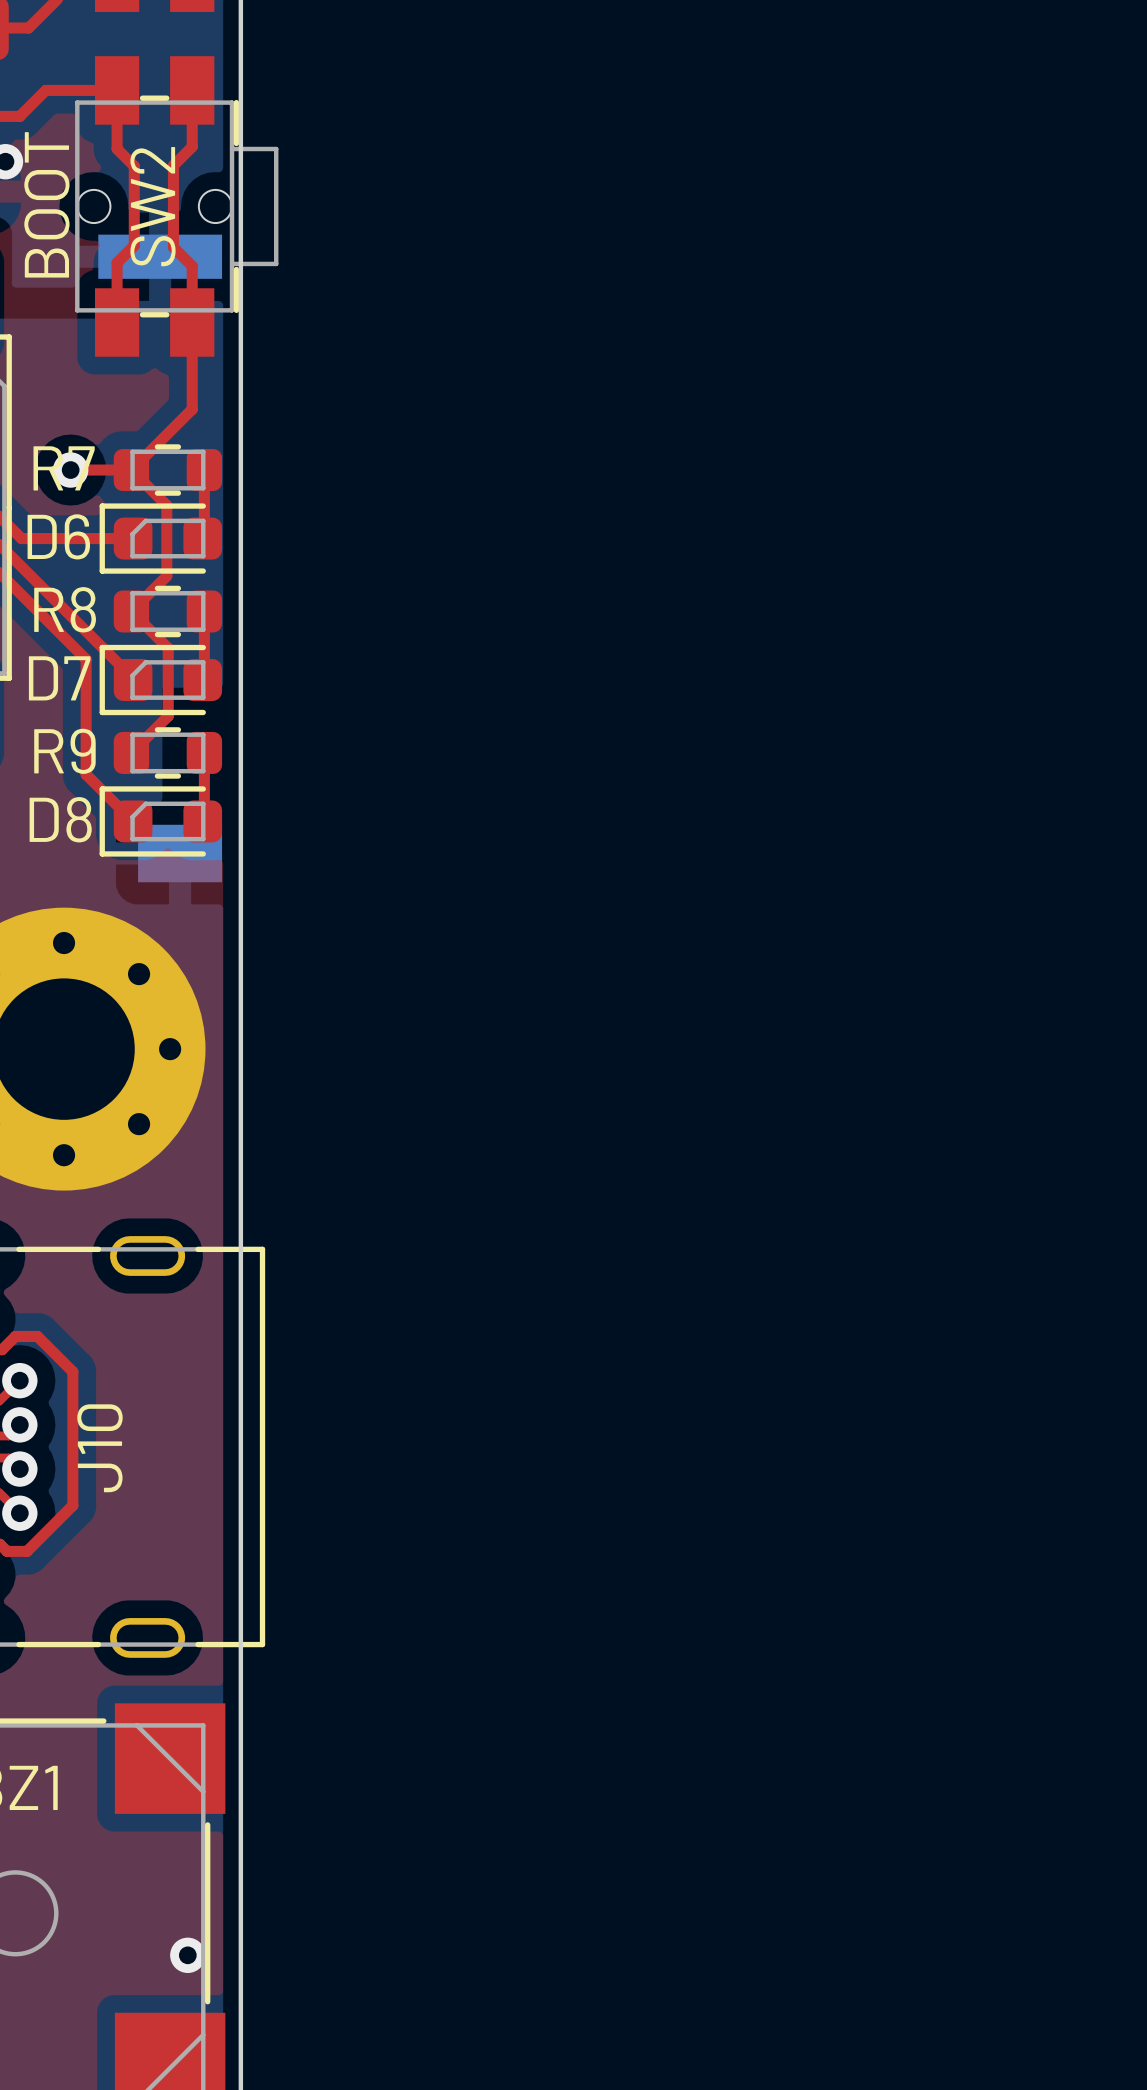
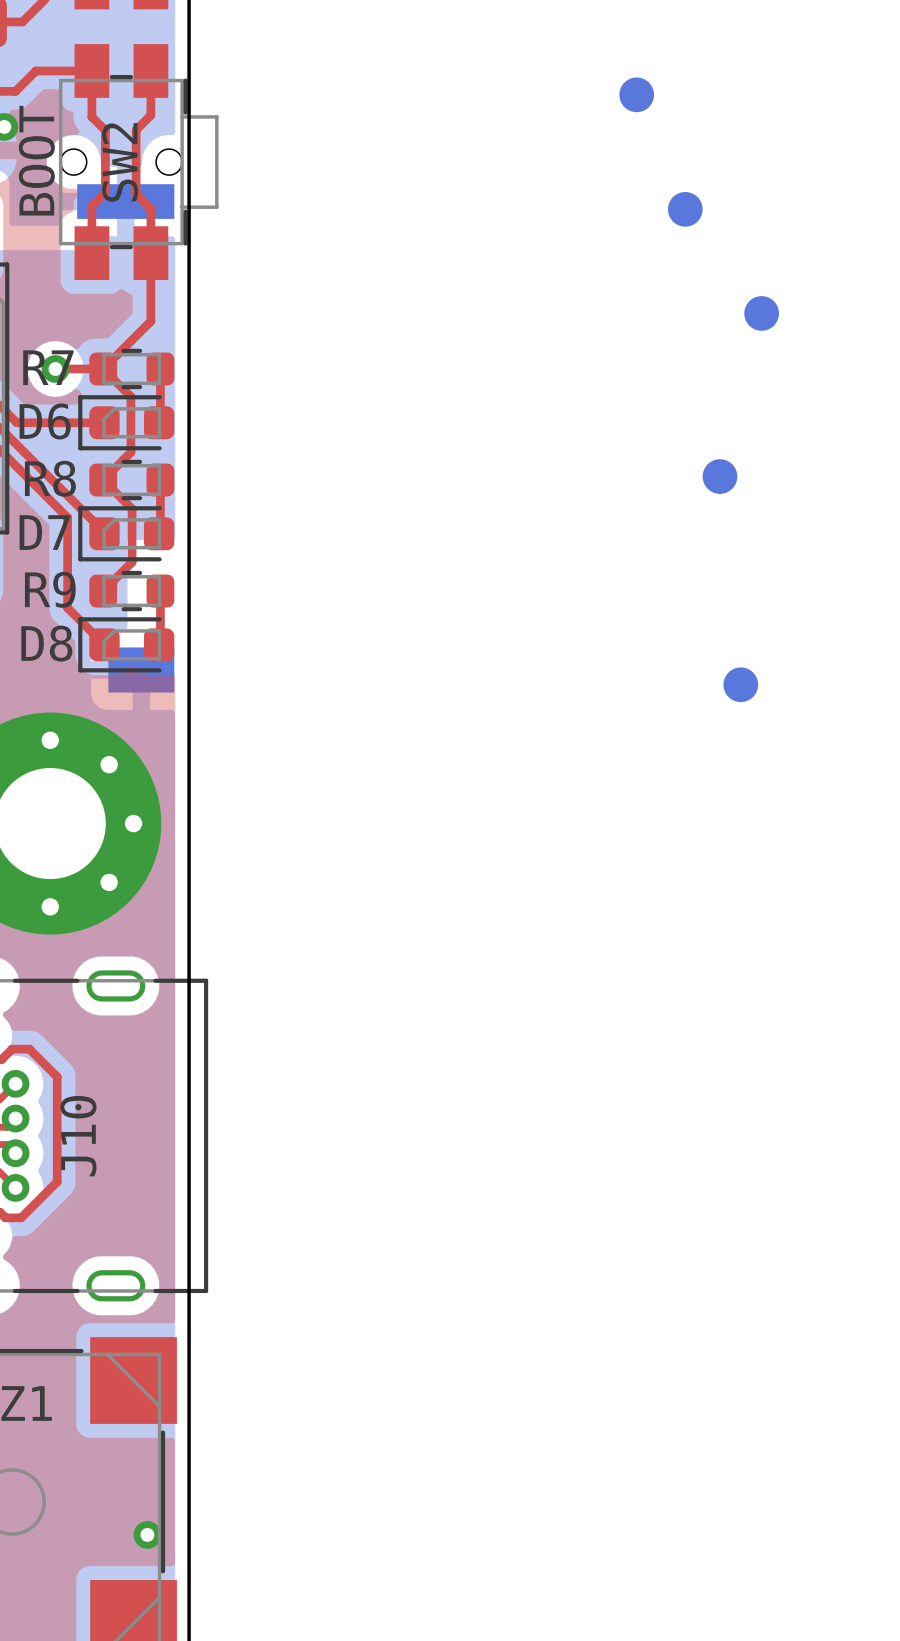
part: none -> (636, 94)
part: none -> (685, 209)
part: none -> (761, 313)
part: none -> (719, 476)
part: none -> (740, 684)

